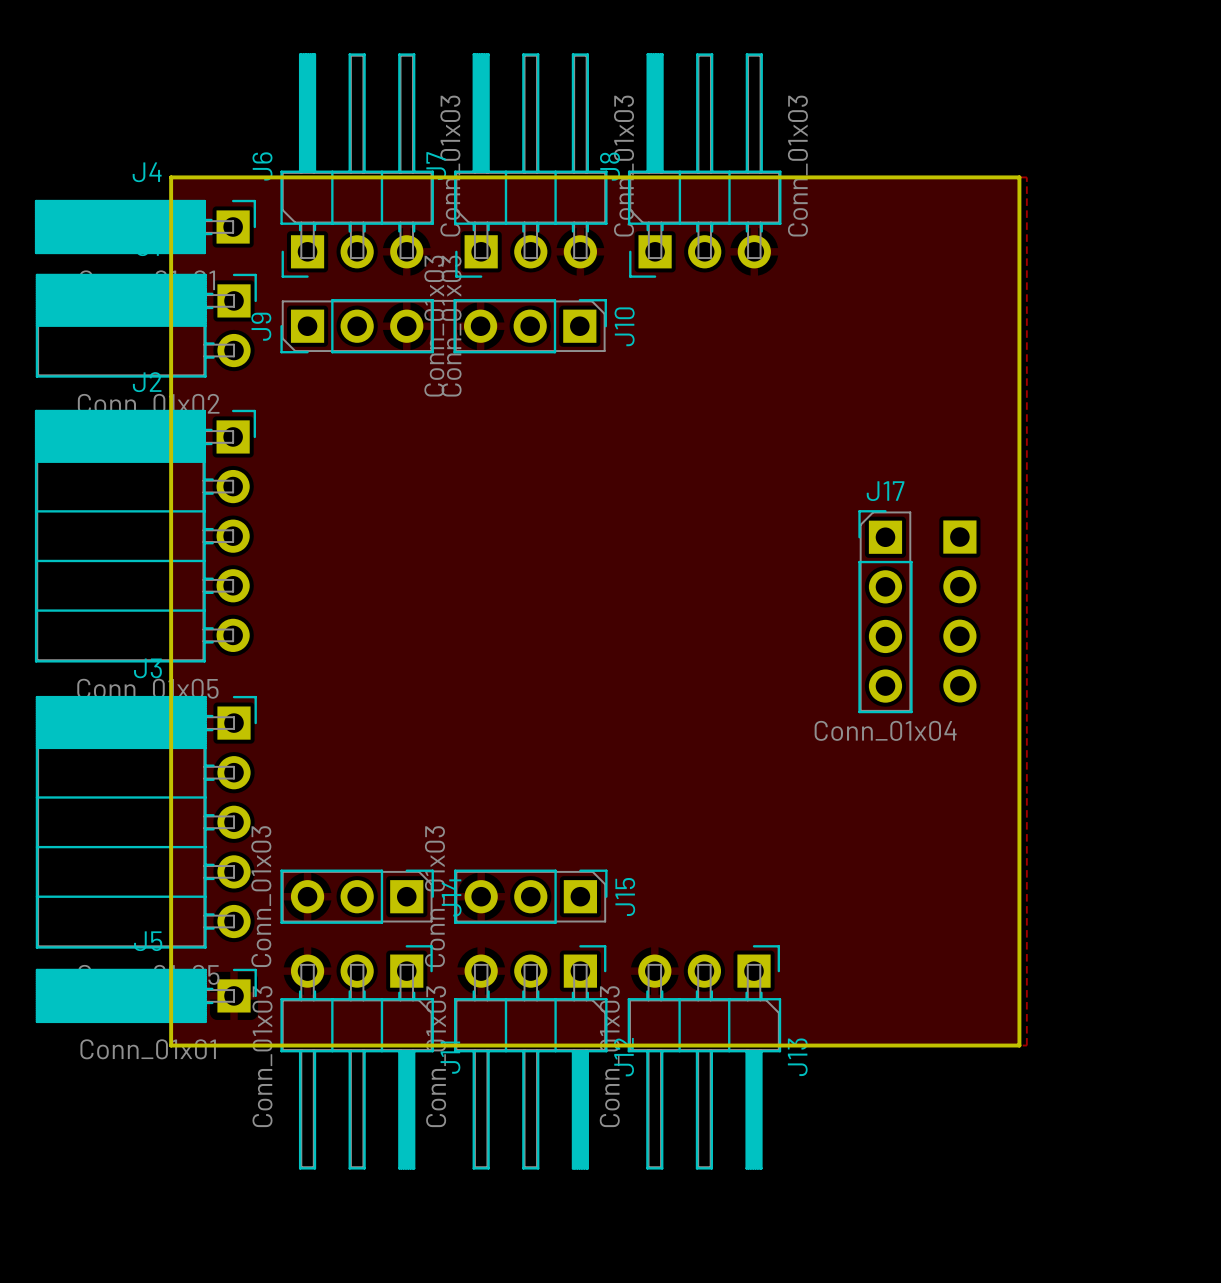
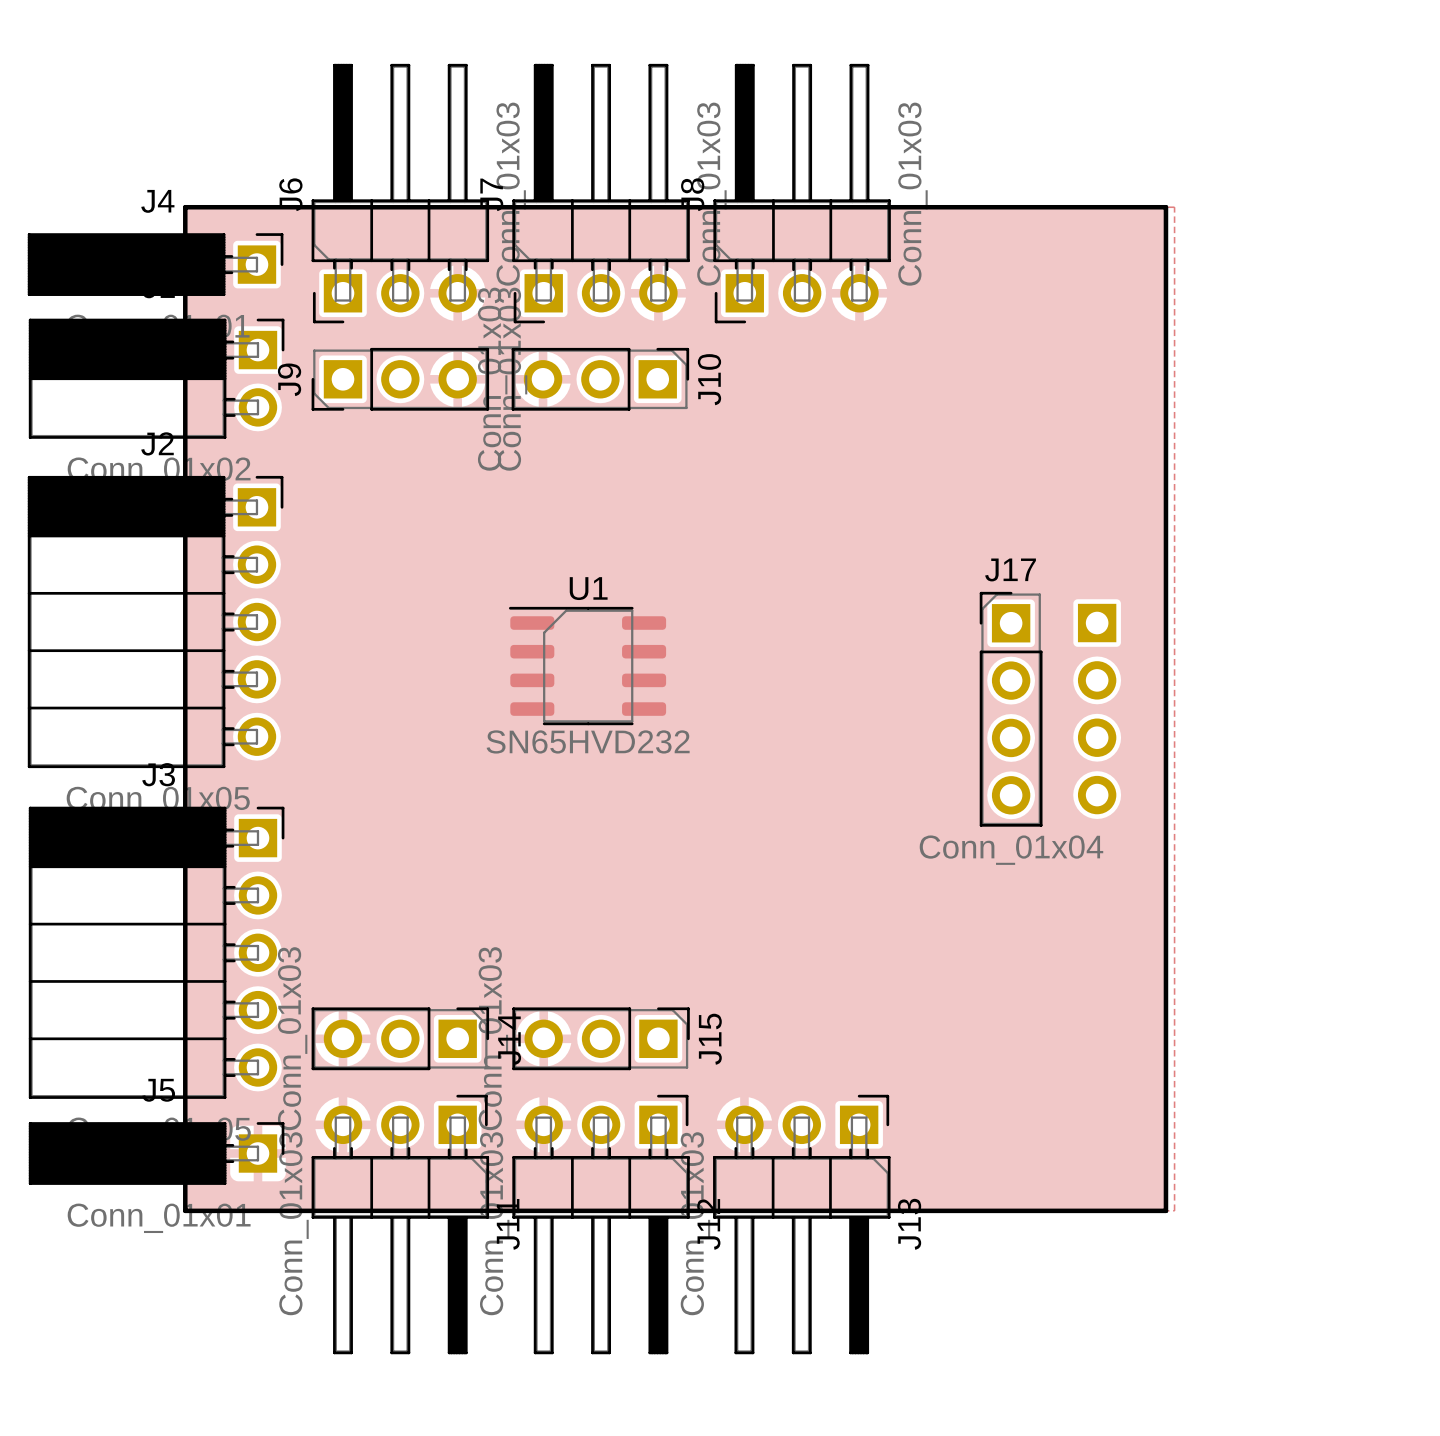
U1: none -> SN65HVD232 (587, 666)

